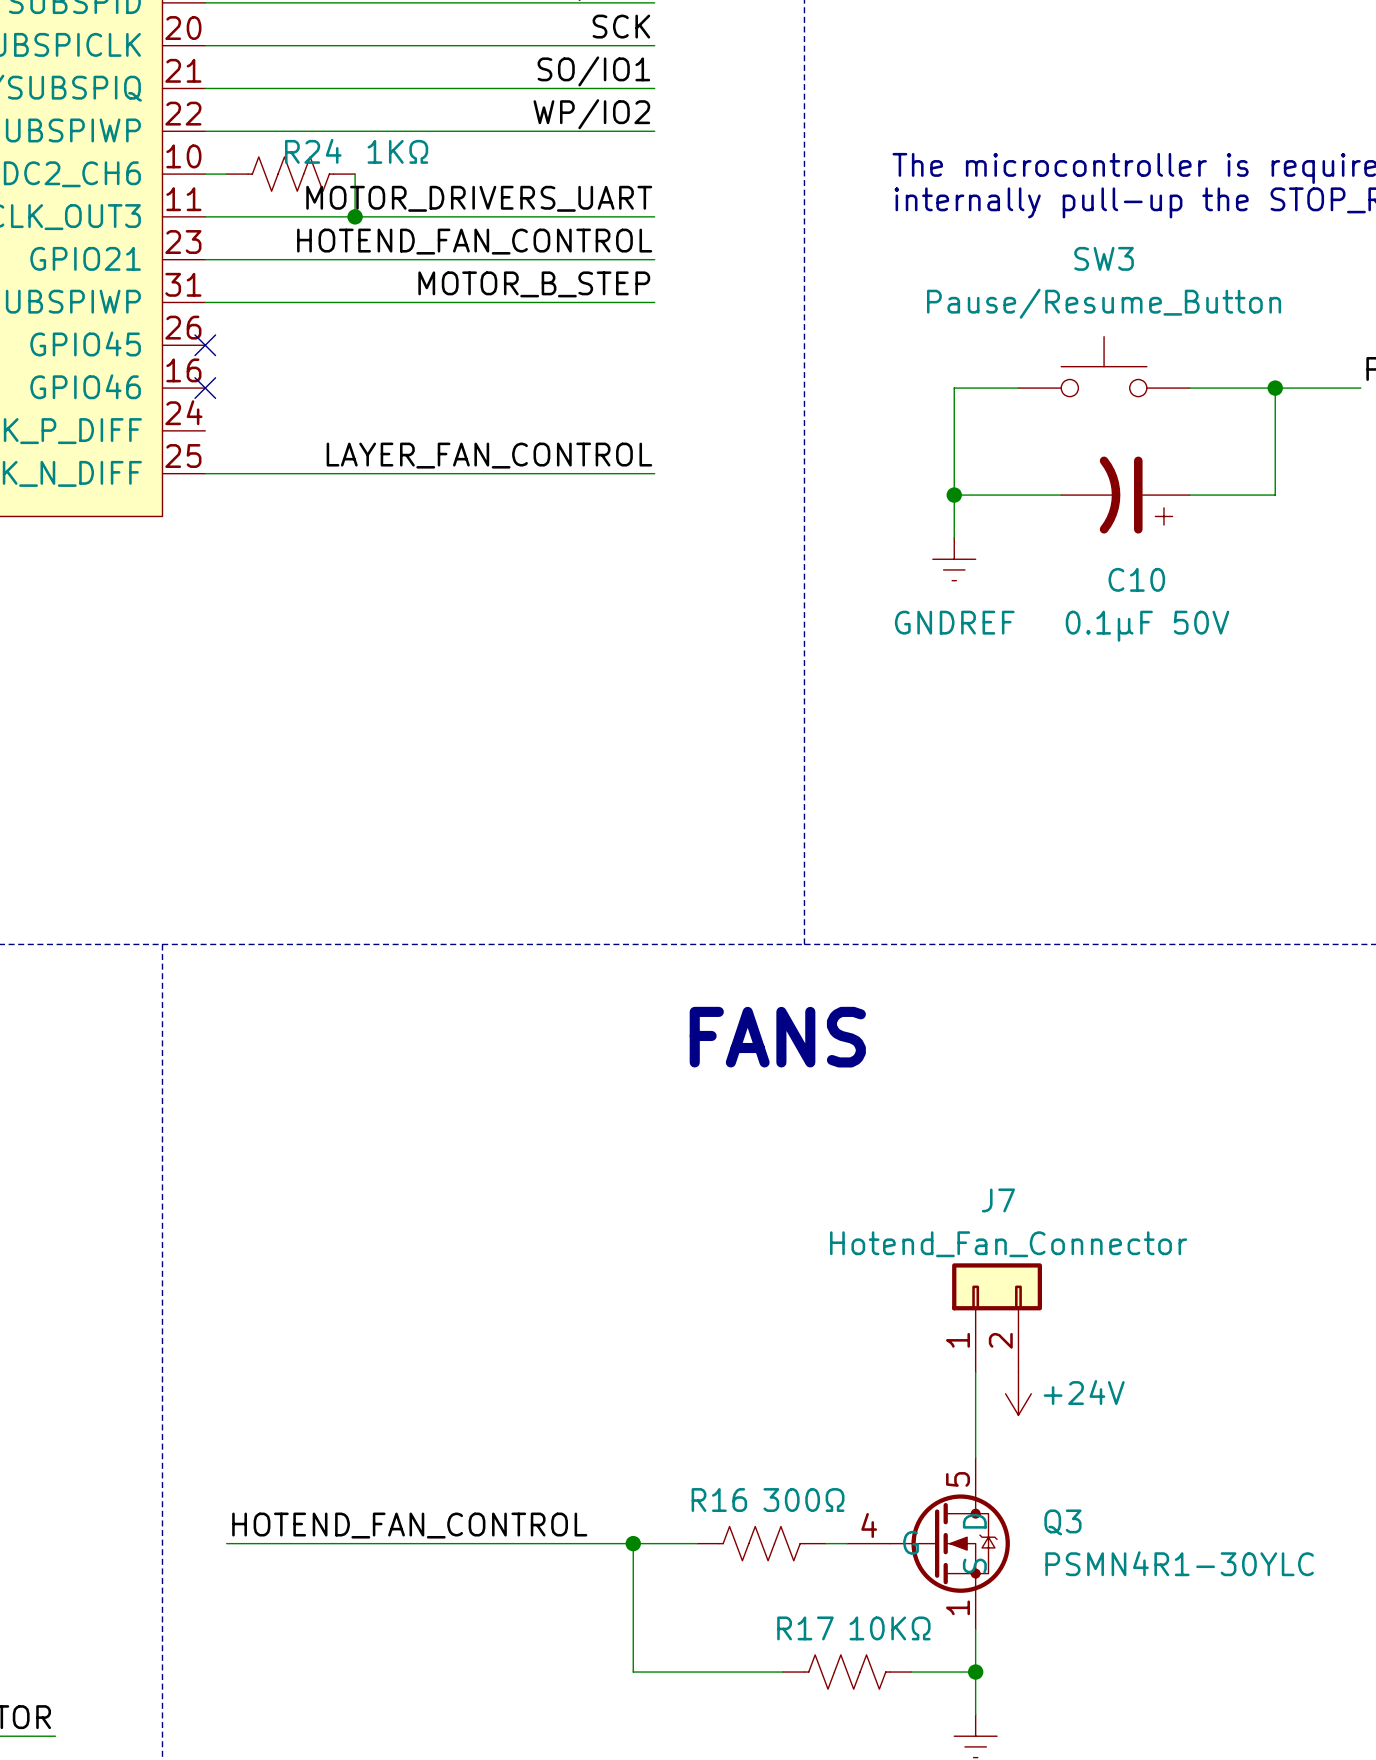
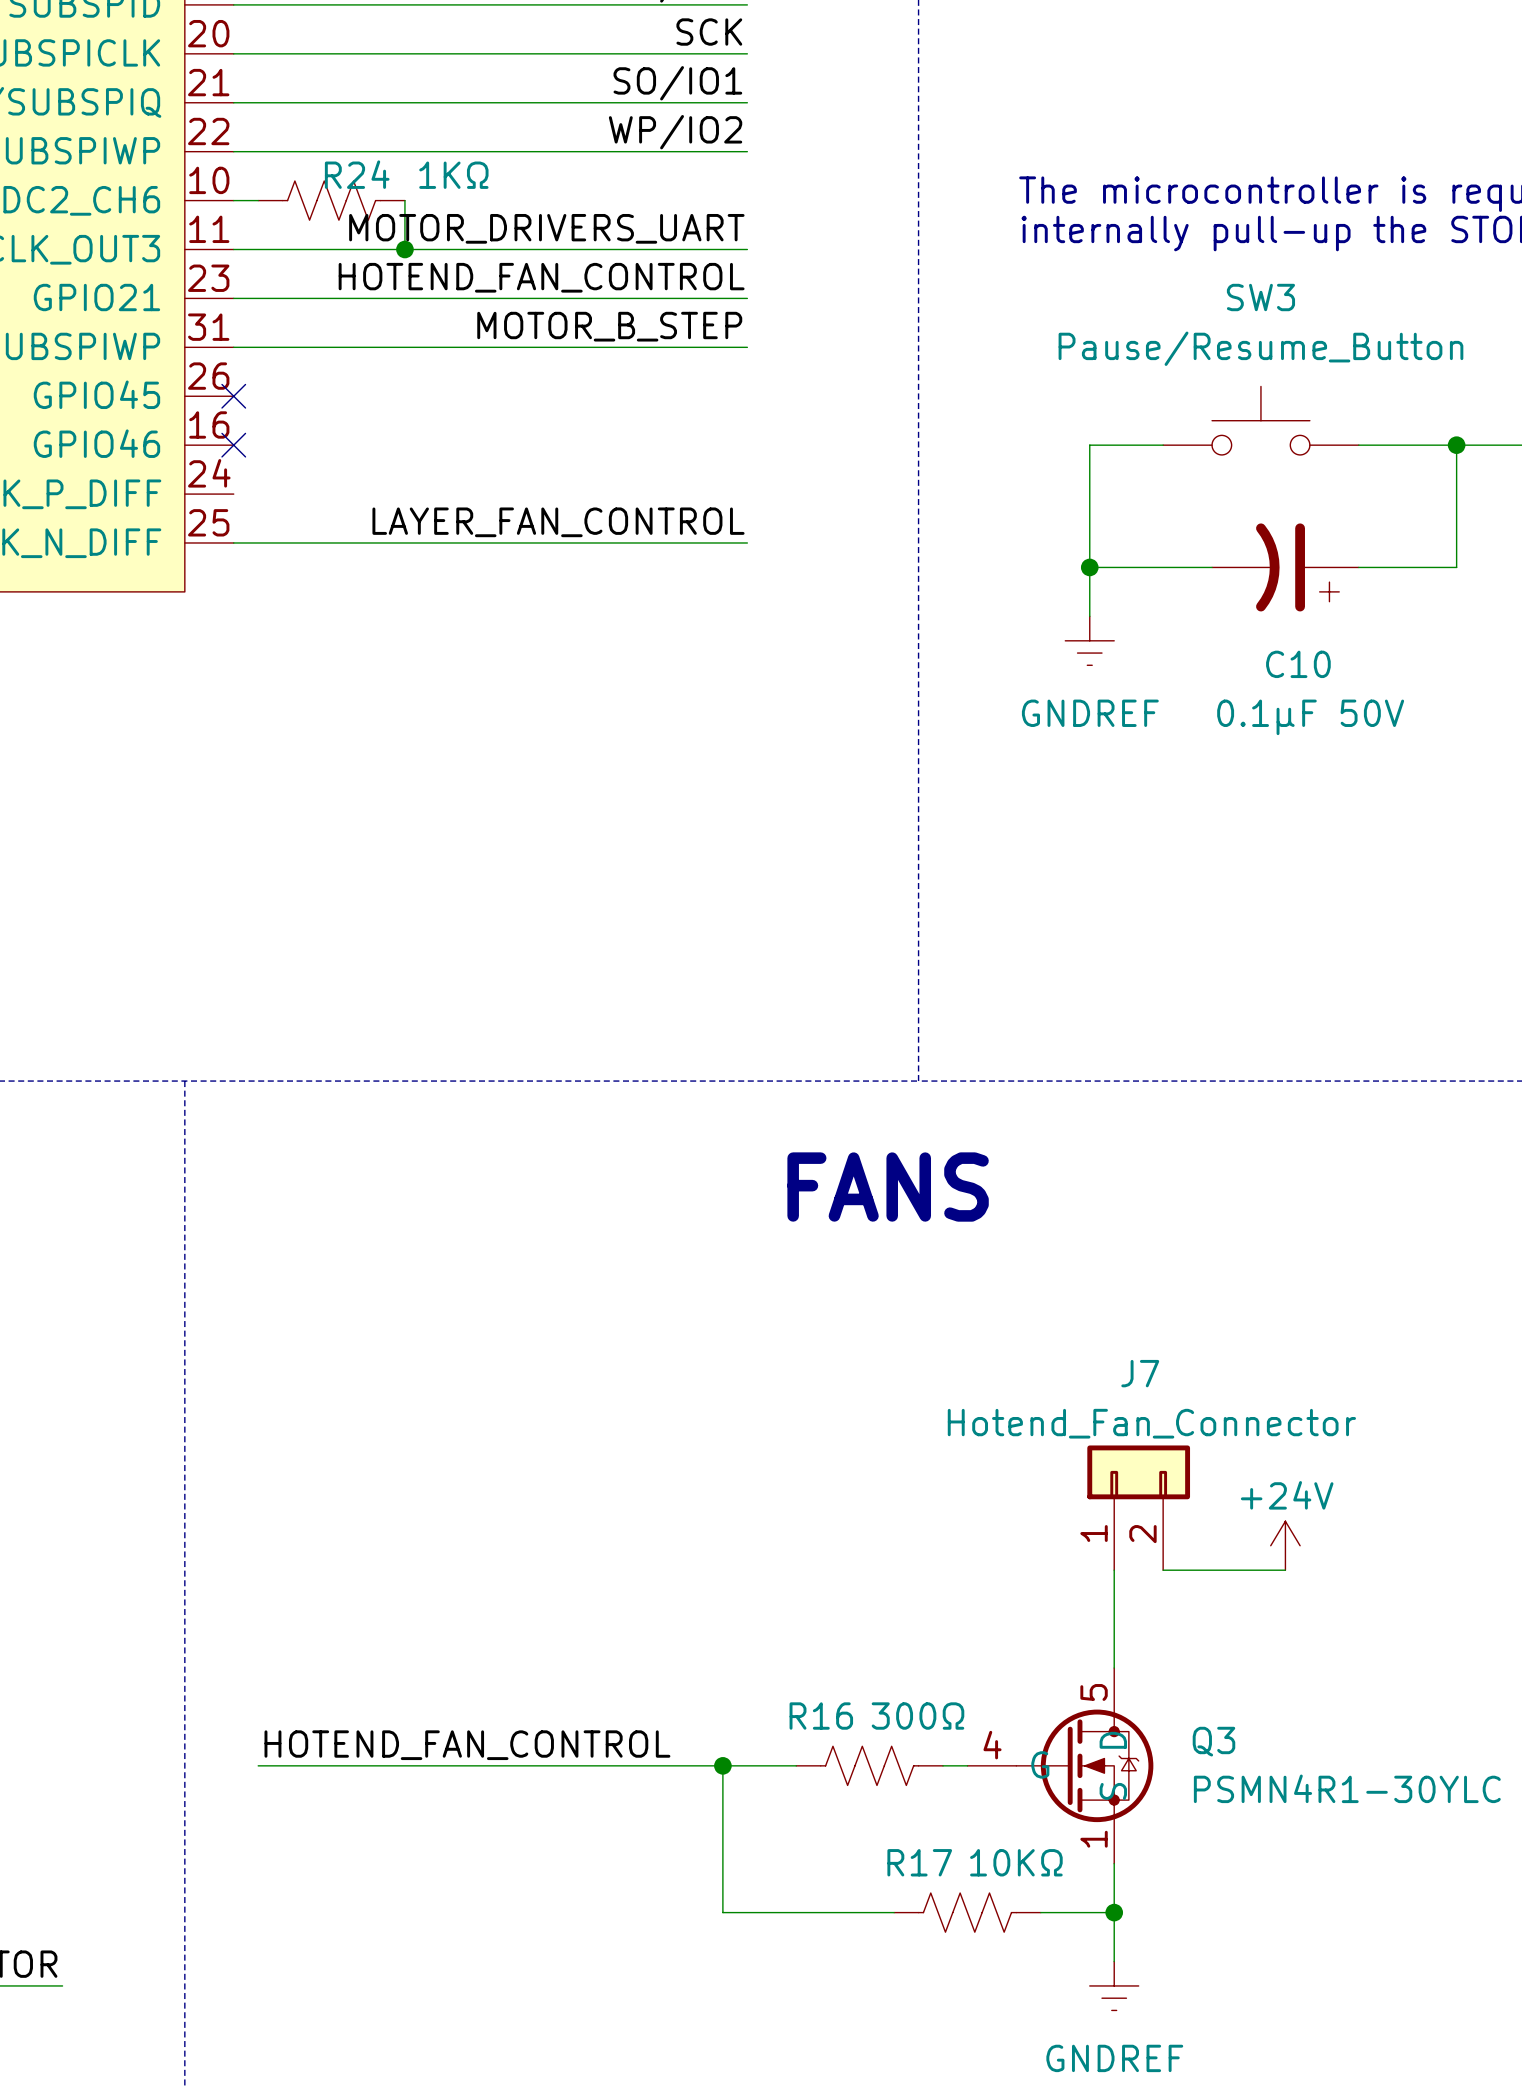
wire: none -> (1163, 1570) (1285, 1570)
power symbol text position: +24V (1084, 1392) -> +24V (1287, 1495)
power symbol rotation: 0° (1018, 1393) -> 180° (1285, 1545)
power symbol position: +24V (1018, 1393) -> +24V (1285, 1545)

